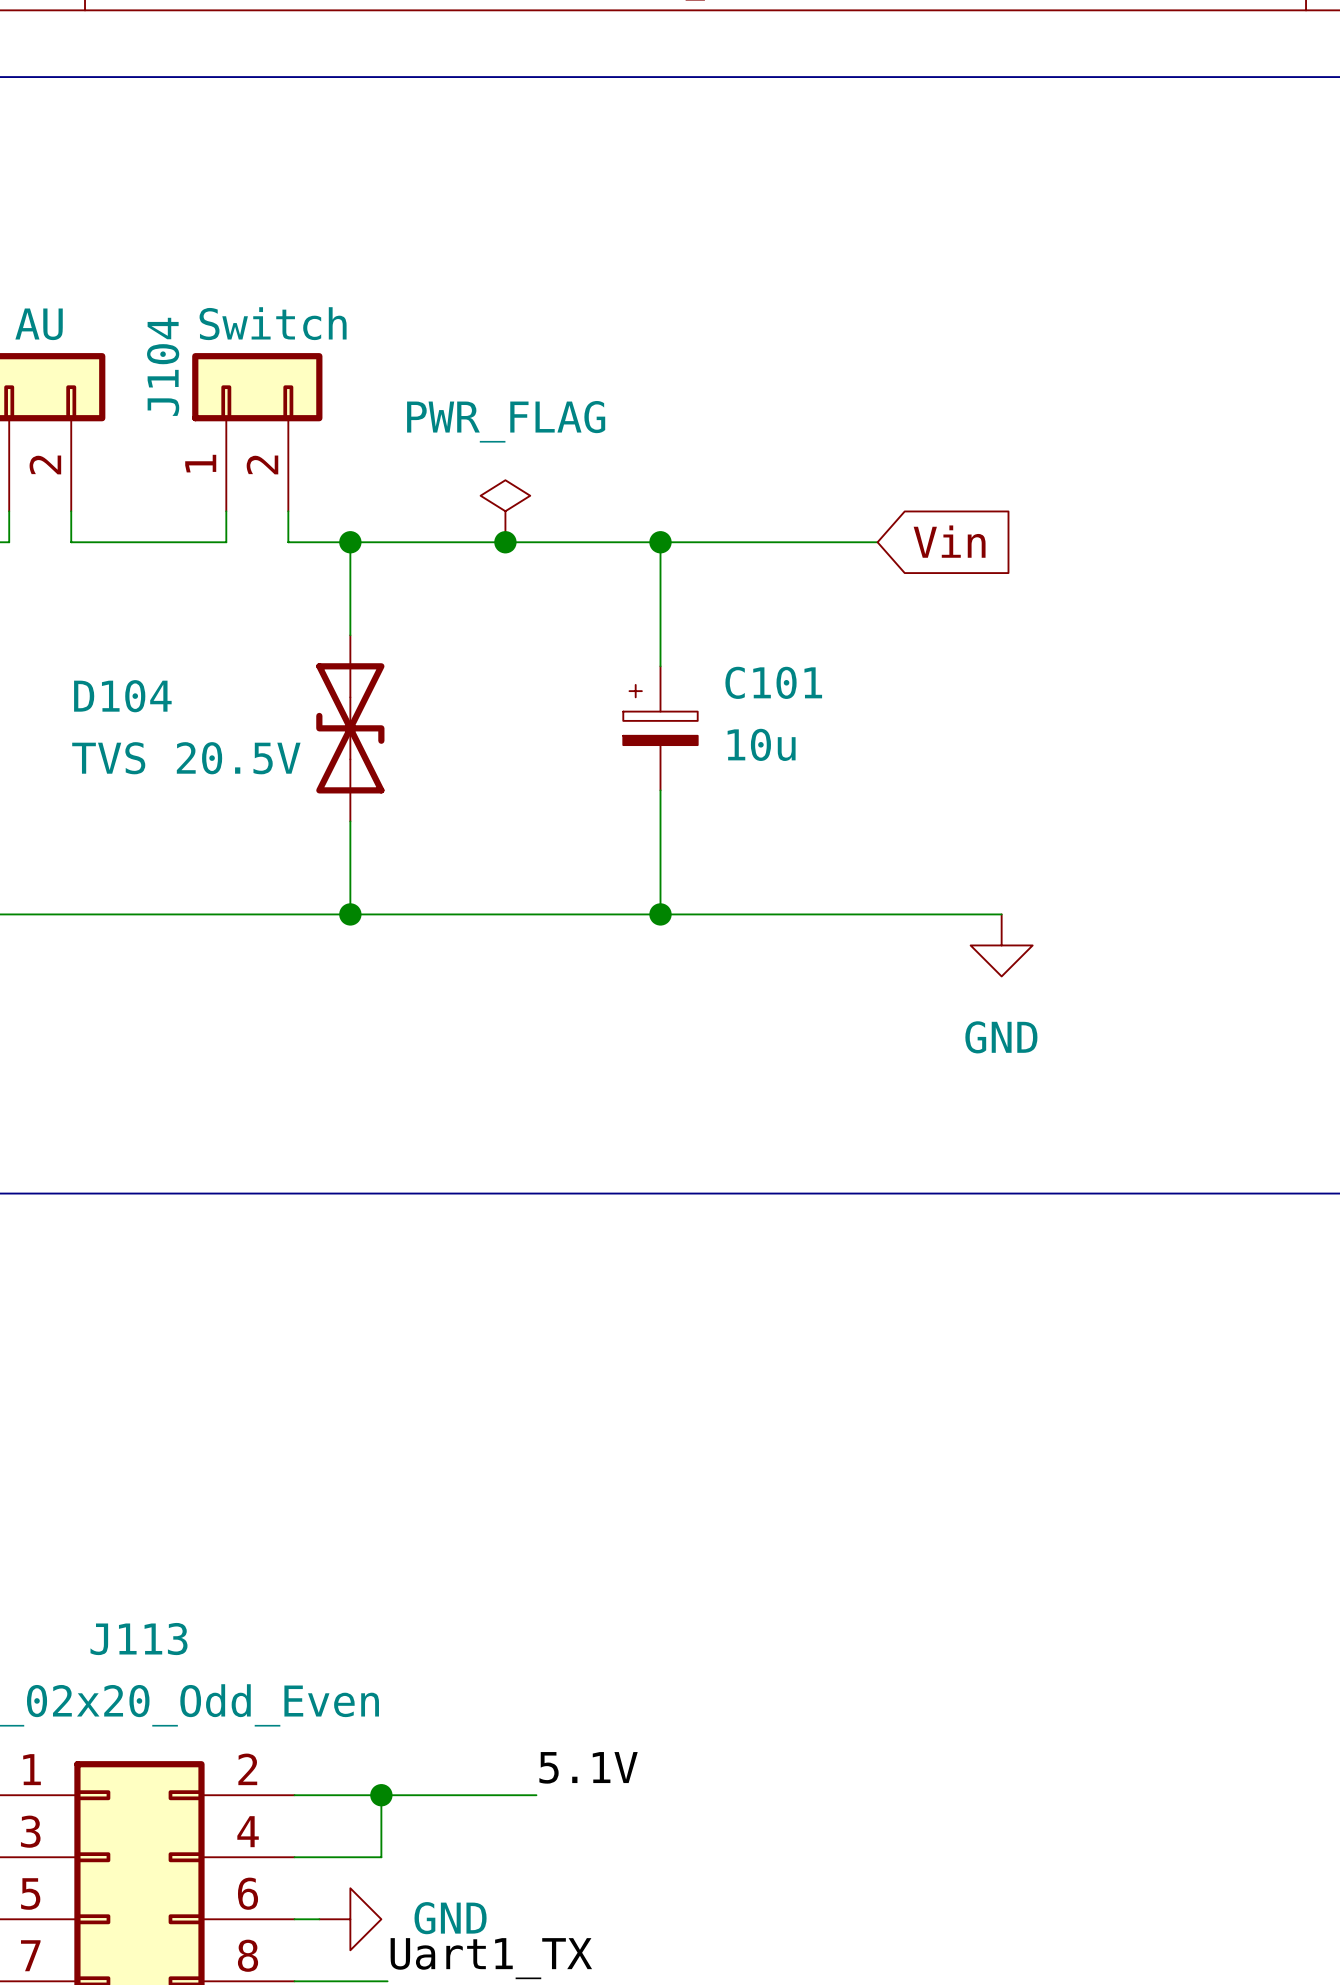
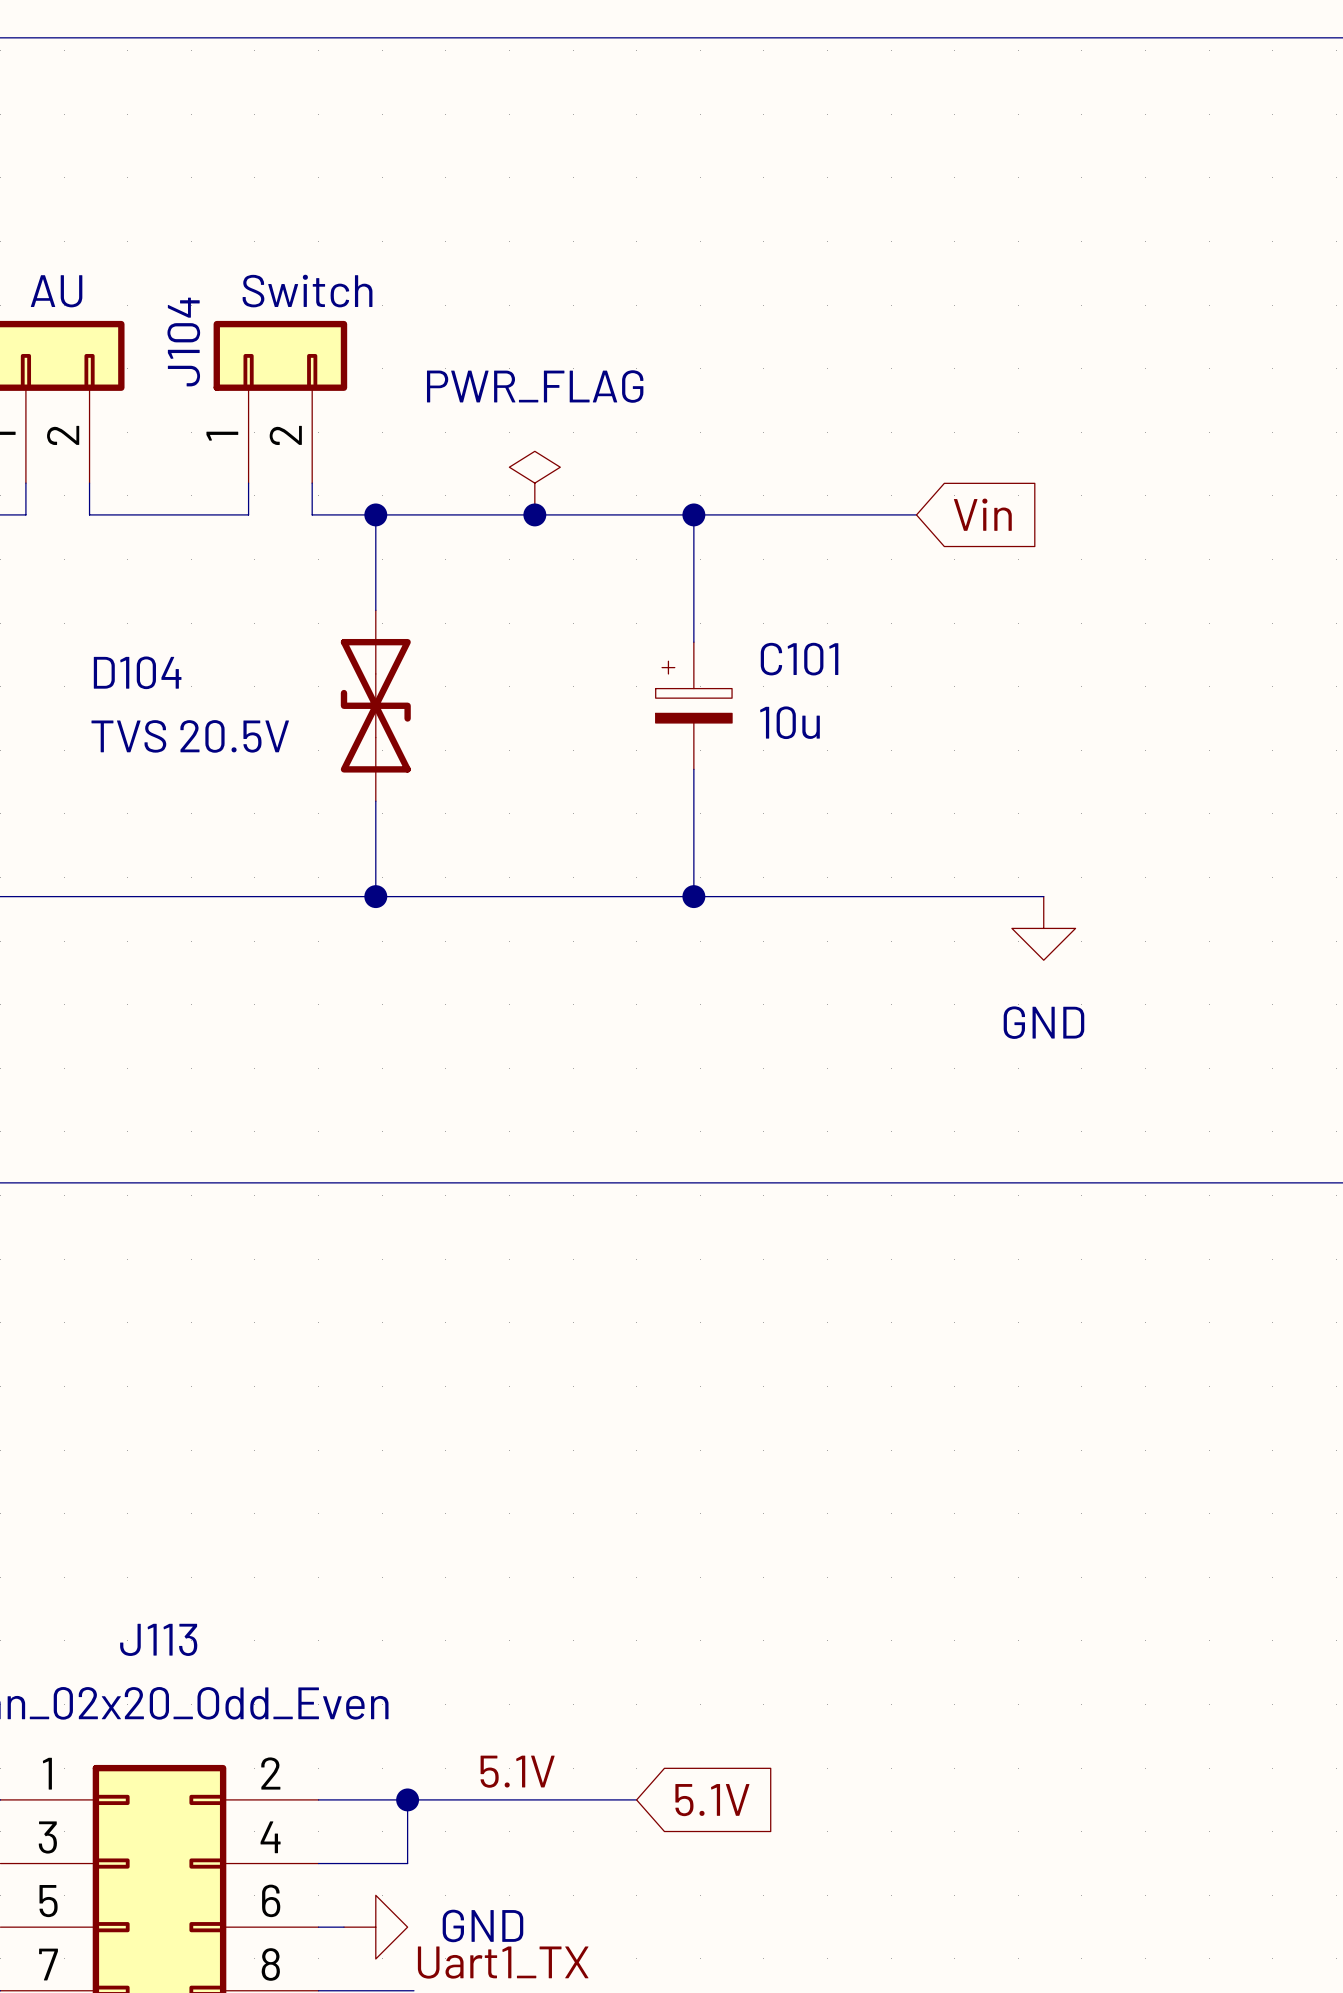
label position: 5.1V (588, 1767) -> 5.1V (517, 1771)
wire: none -> (566, 1799) (636, 1799)
global label: none -> 5.1V (712, 1800)

